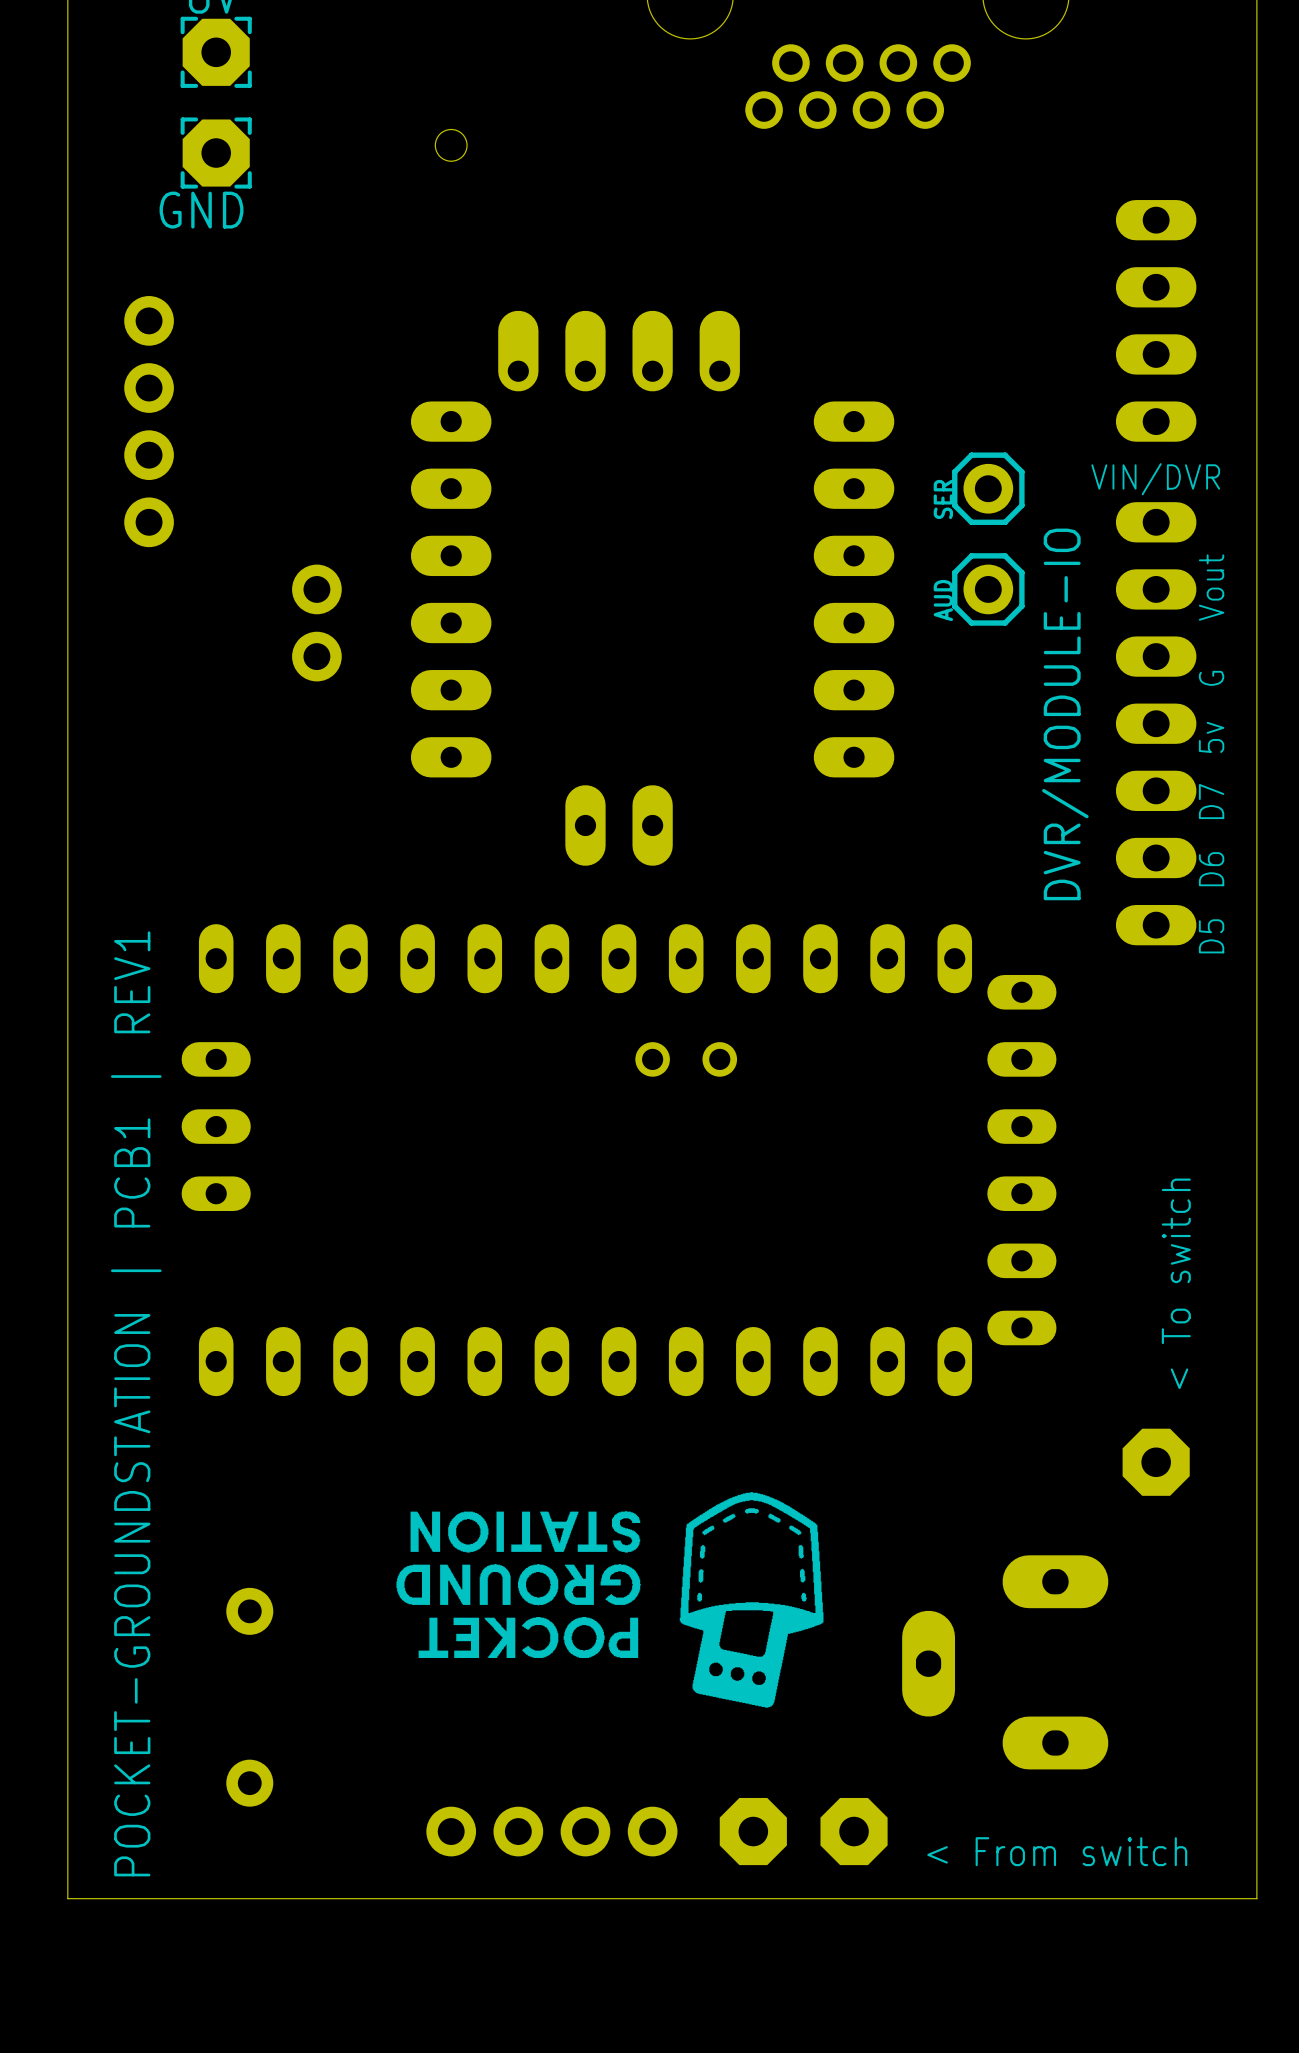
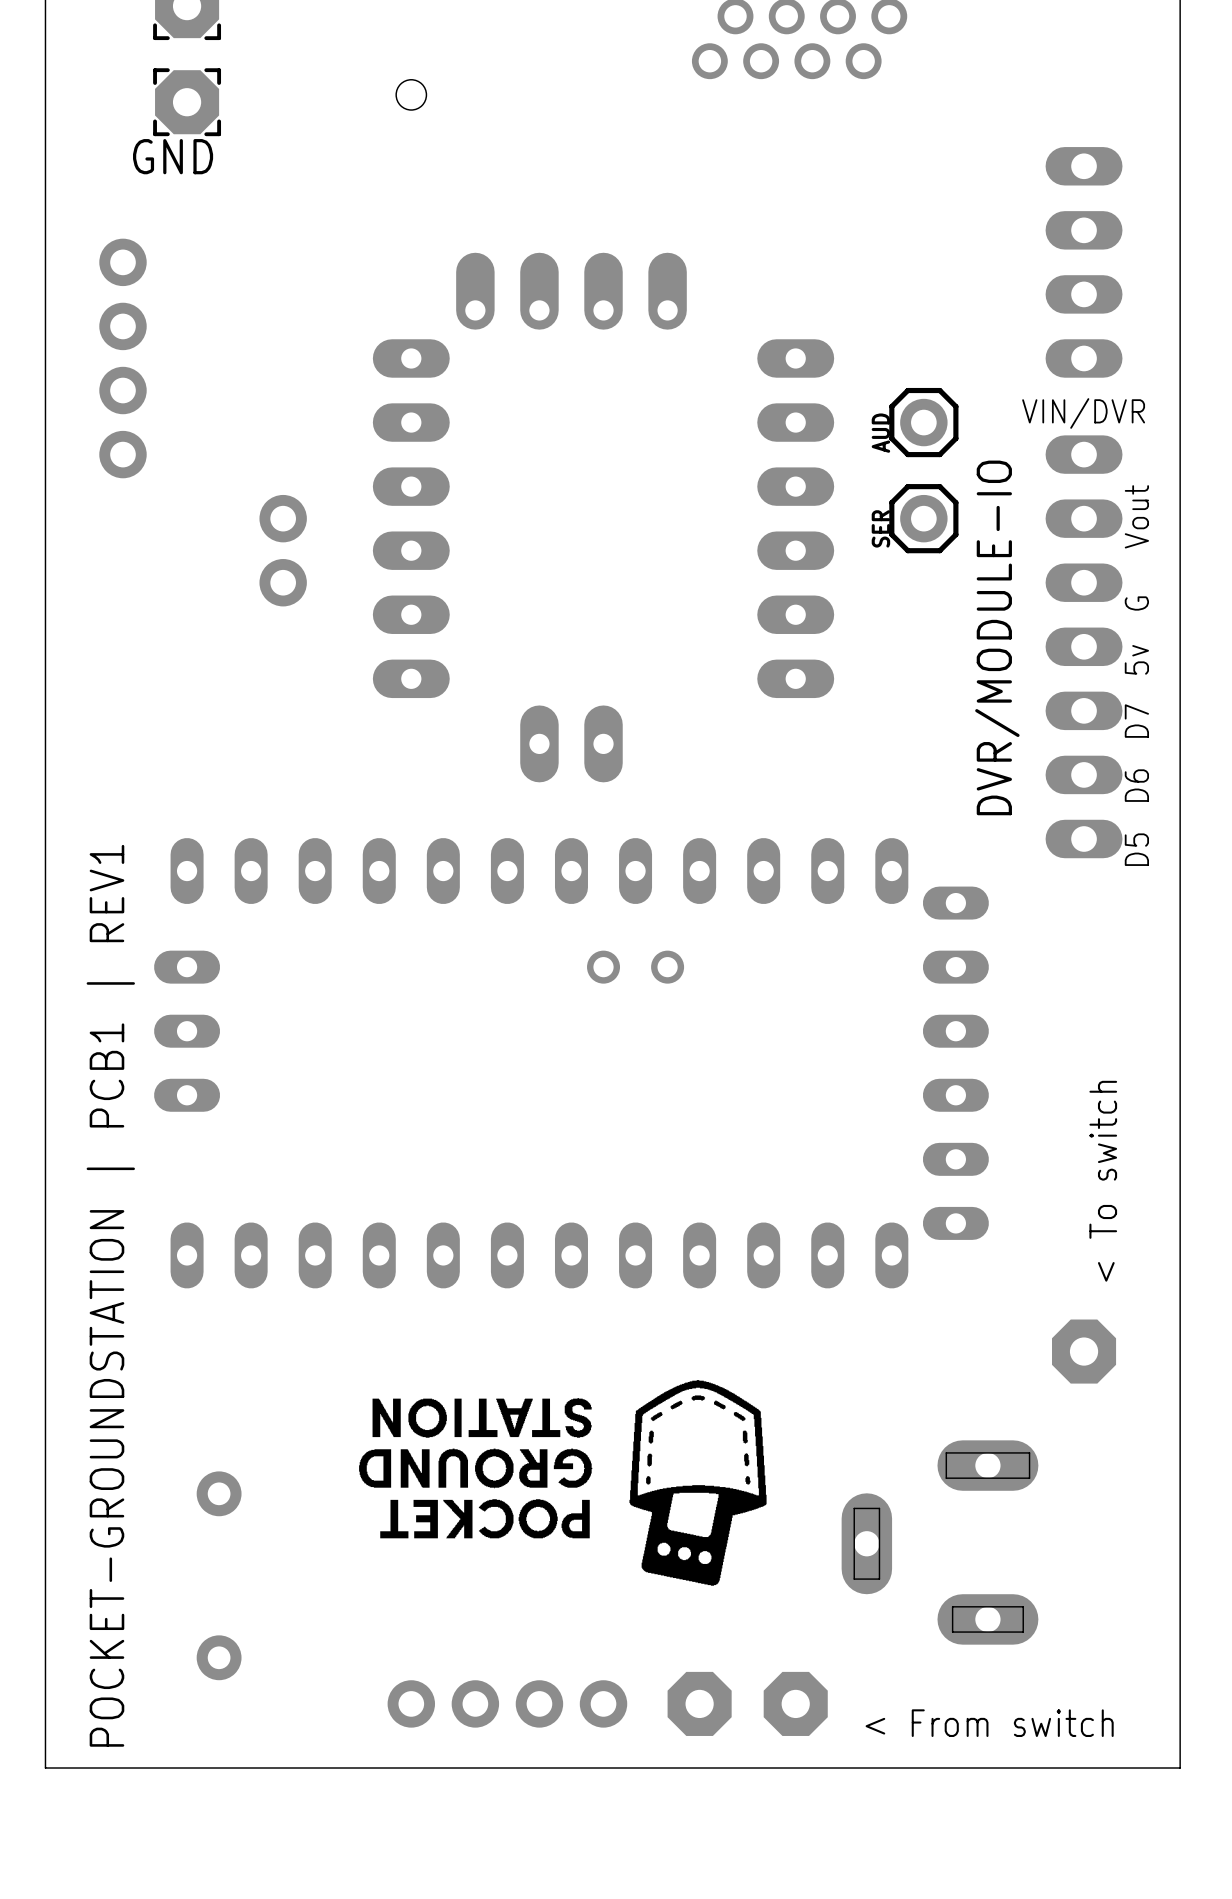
SER name: SER (943, 499) -> AUD (880, 433)
AUD name: AUD (943, 600) -> SER (880, 528)

